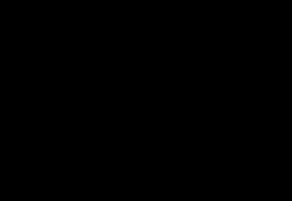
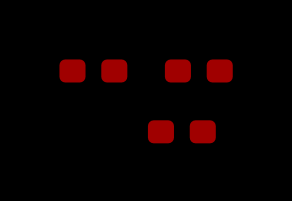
part: none -> (93, 70)
part: none -> (198, 70)
part: none -> (181, 131)

